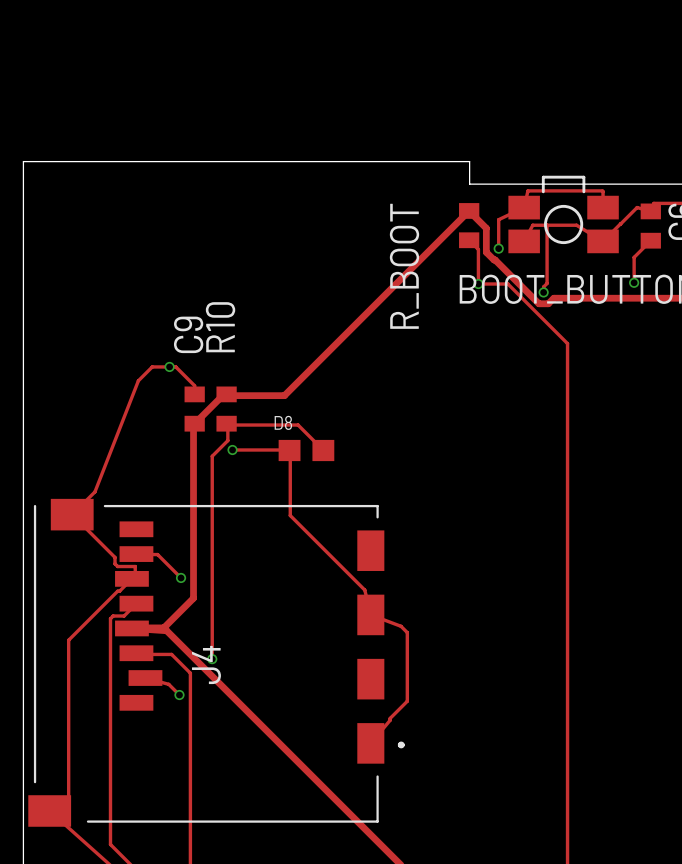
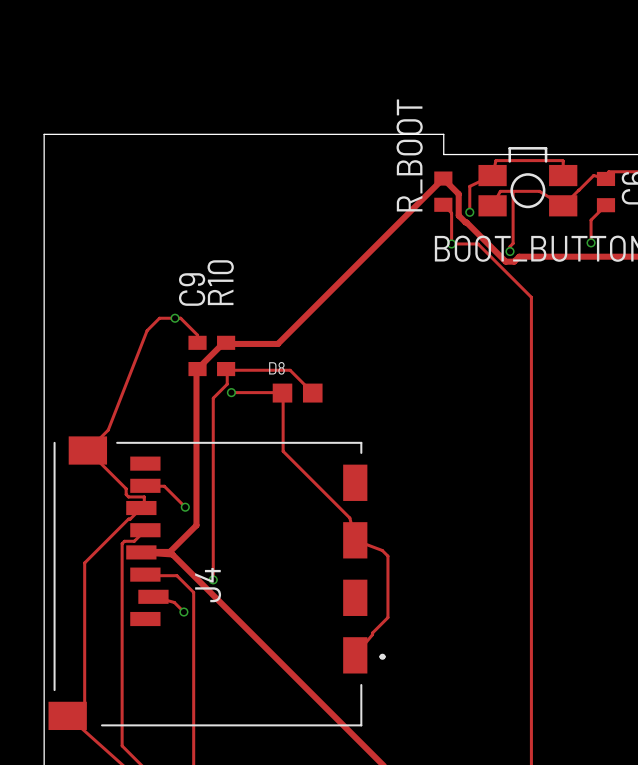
R_BOOT name position: R_BOOT (404, 266) -> R_BOOT (409, 155)

